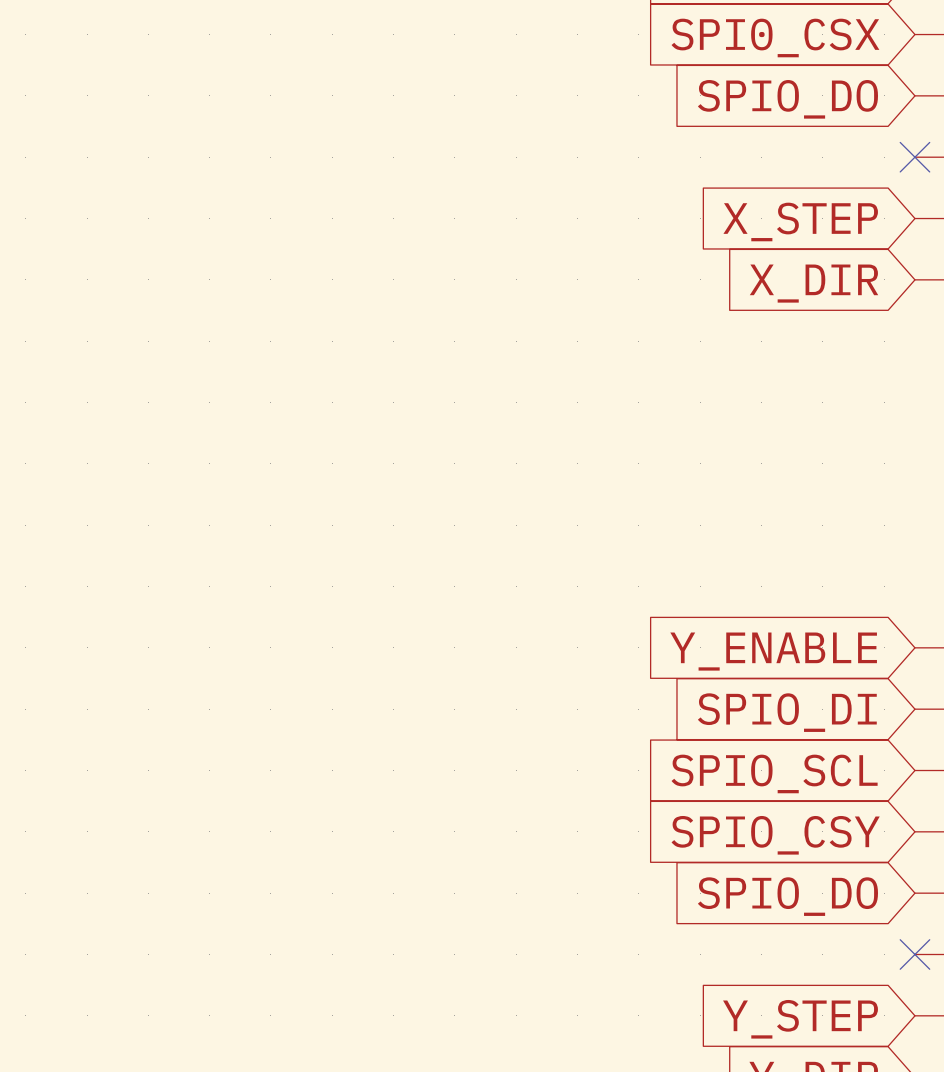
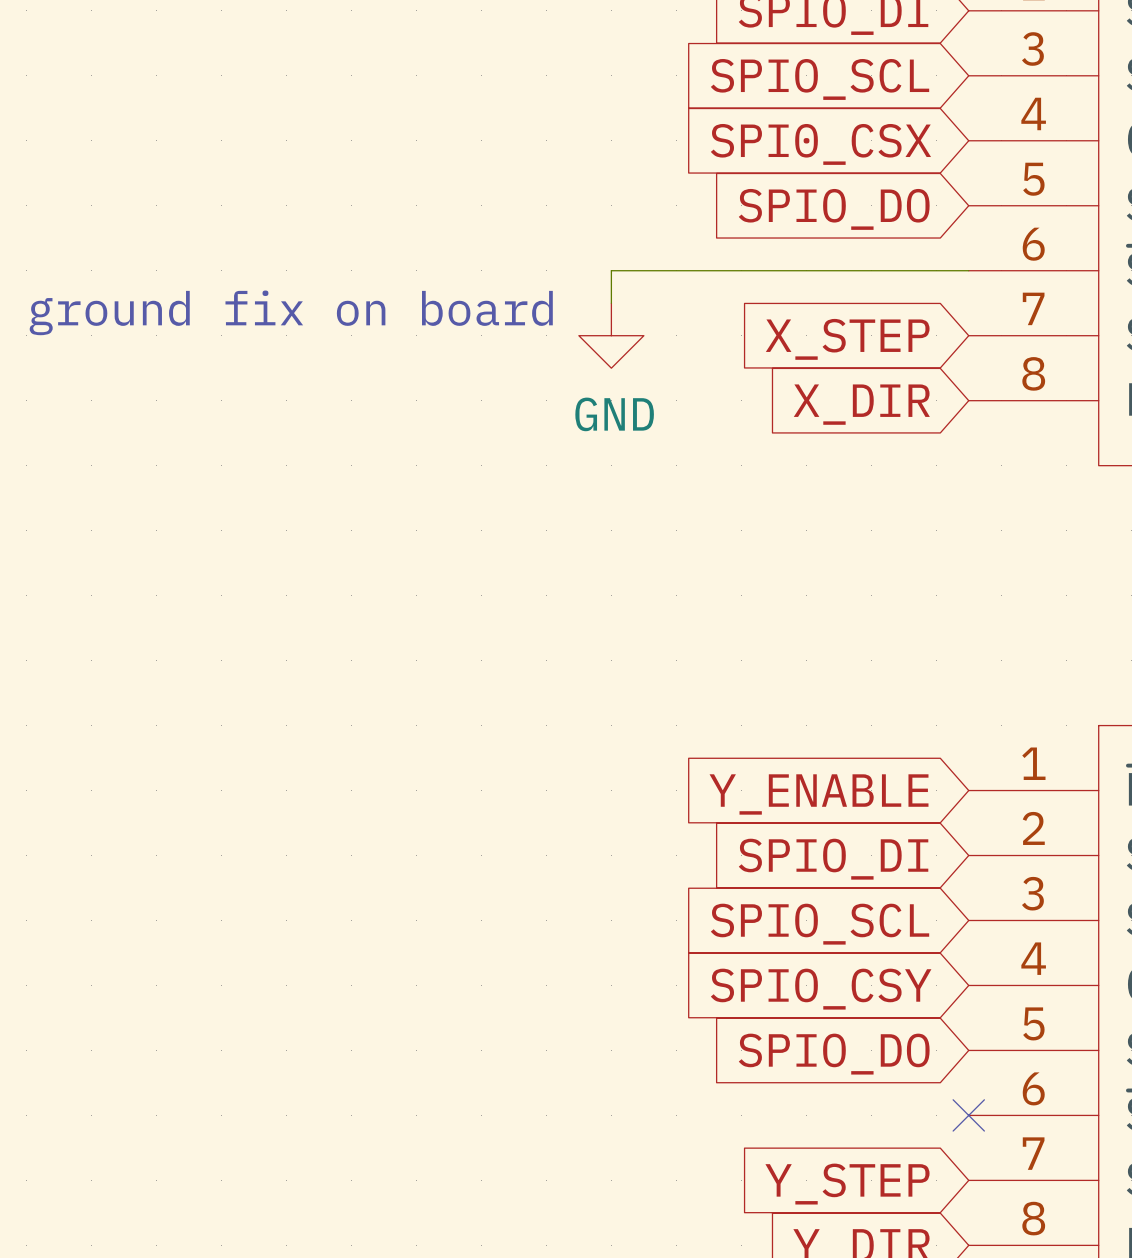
wire: none -> (968, 270) (611, 270) (611, 303)
no-connect mark: (914, 157) -> none
text: none -> ground fix on board (291, 312)
power symbol: none -> GND (611, 335)

